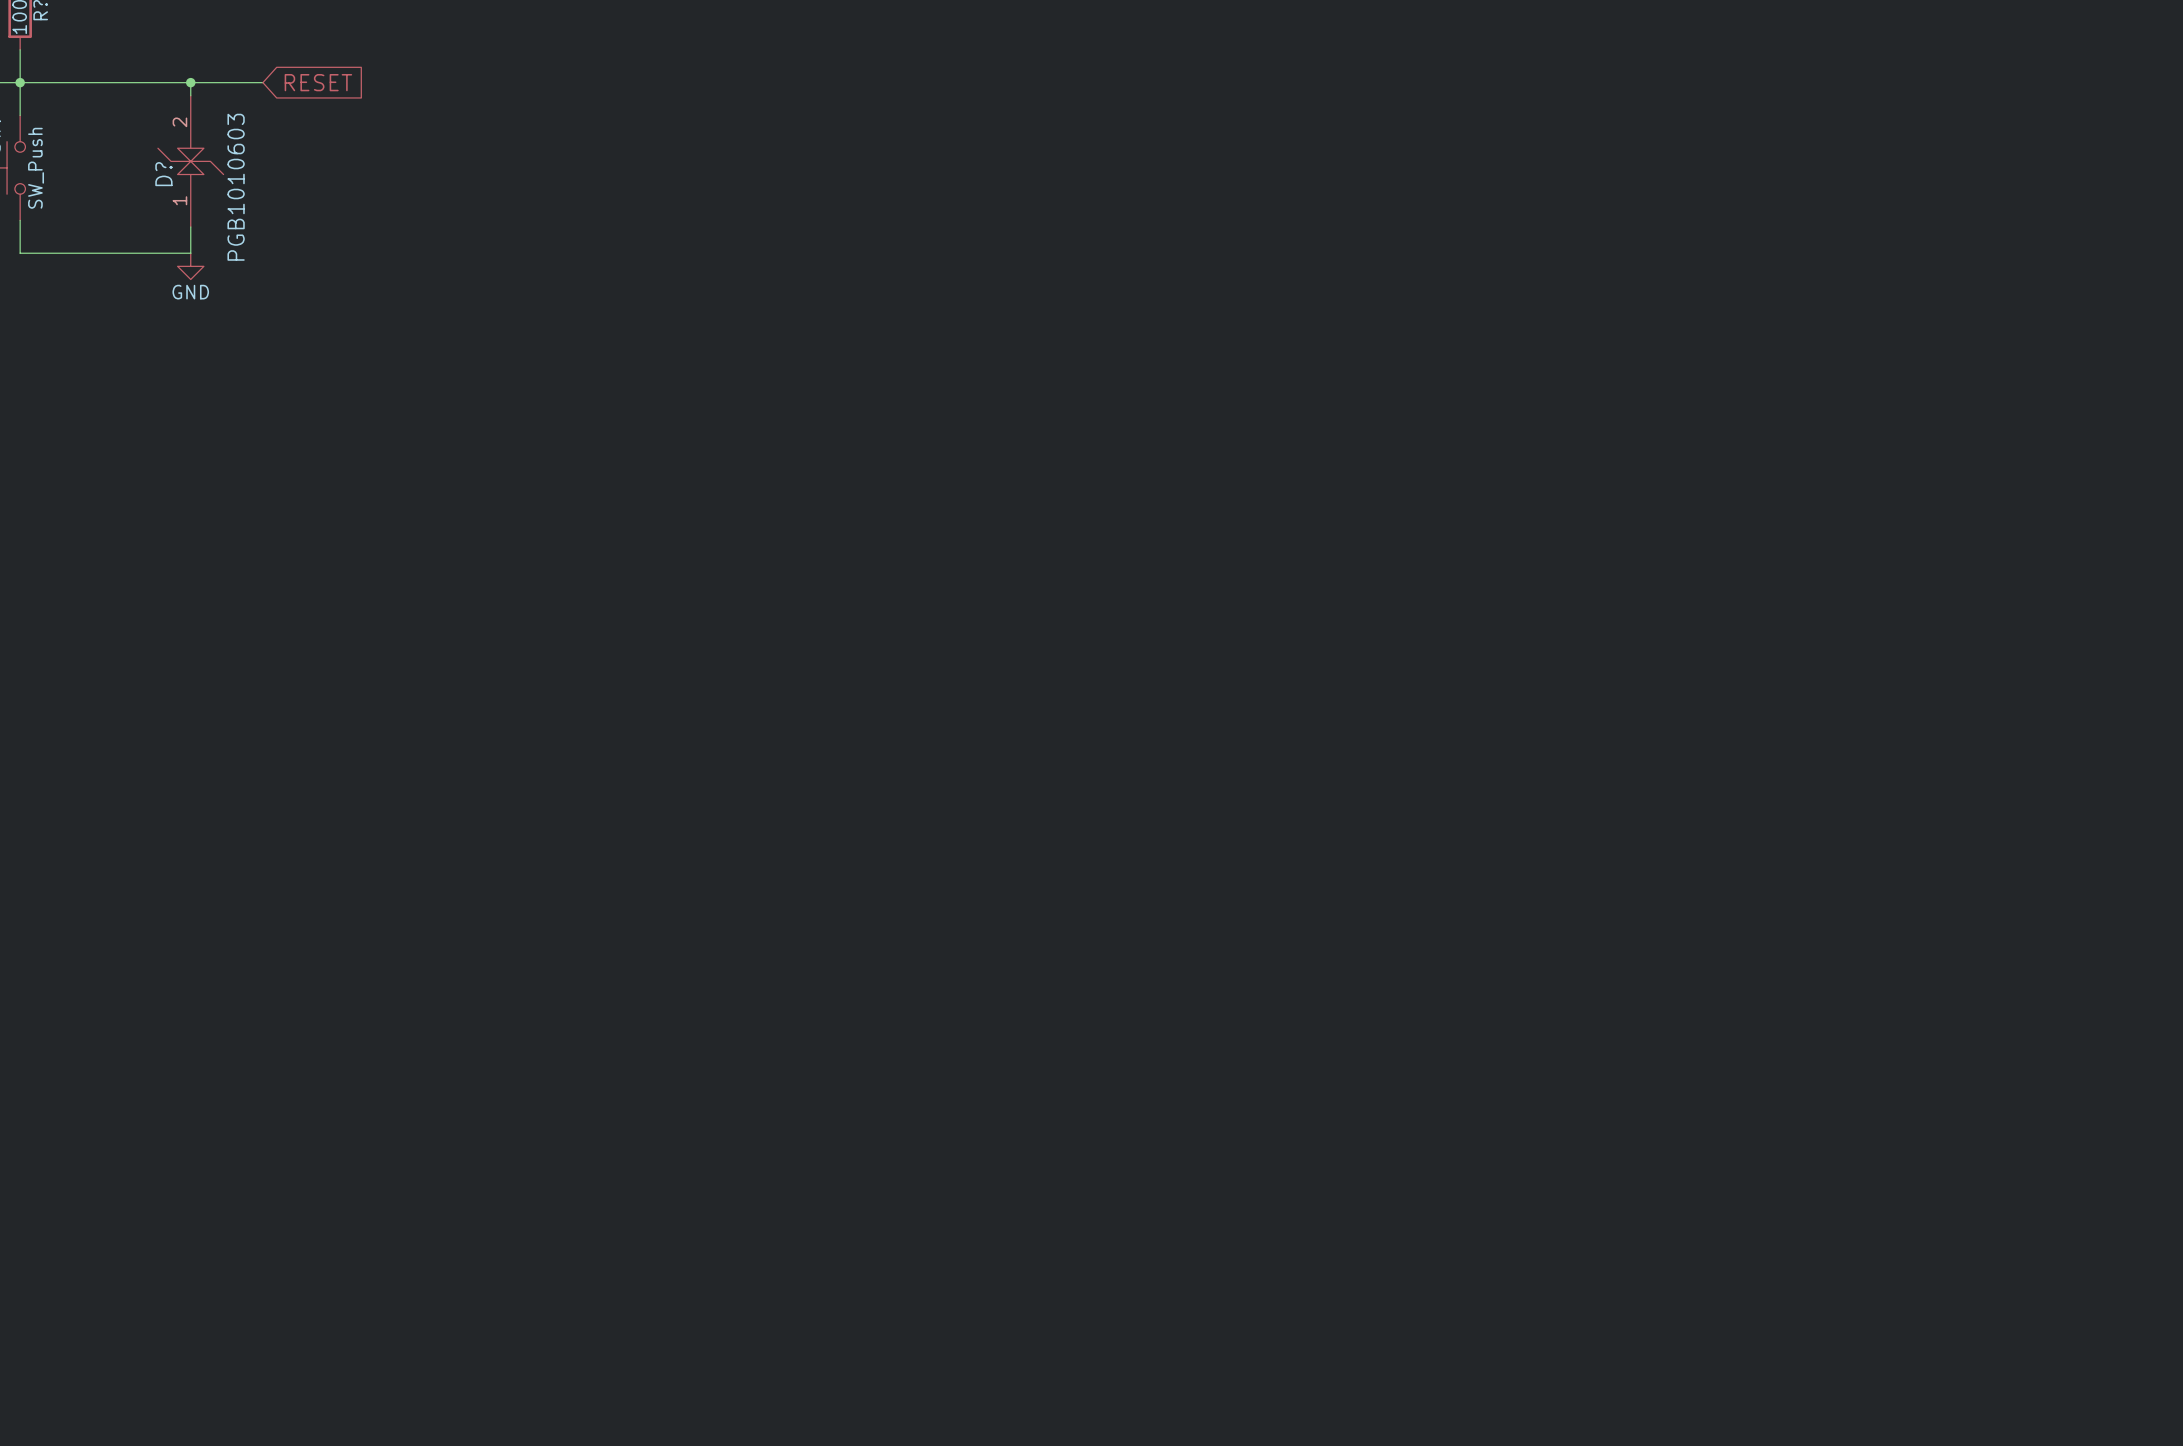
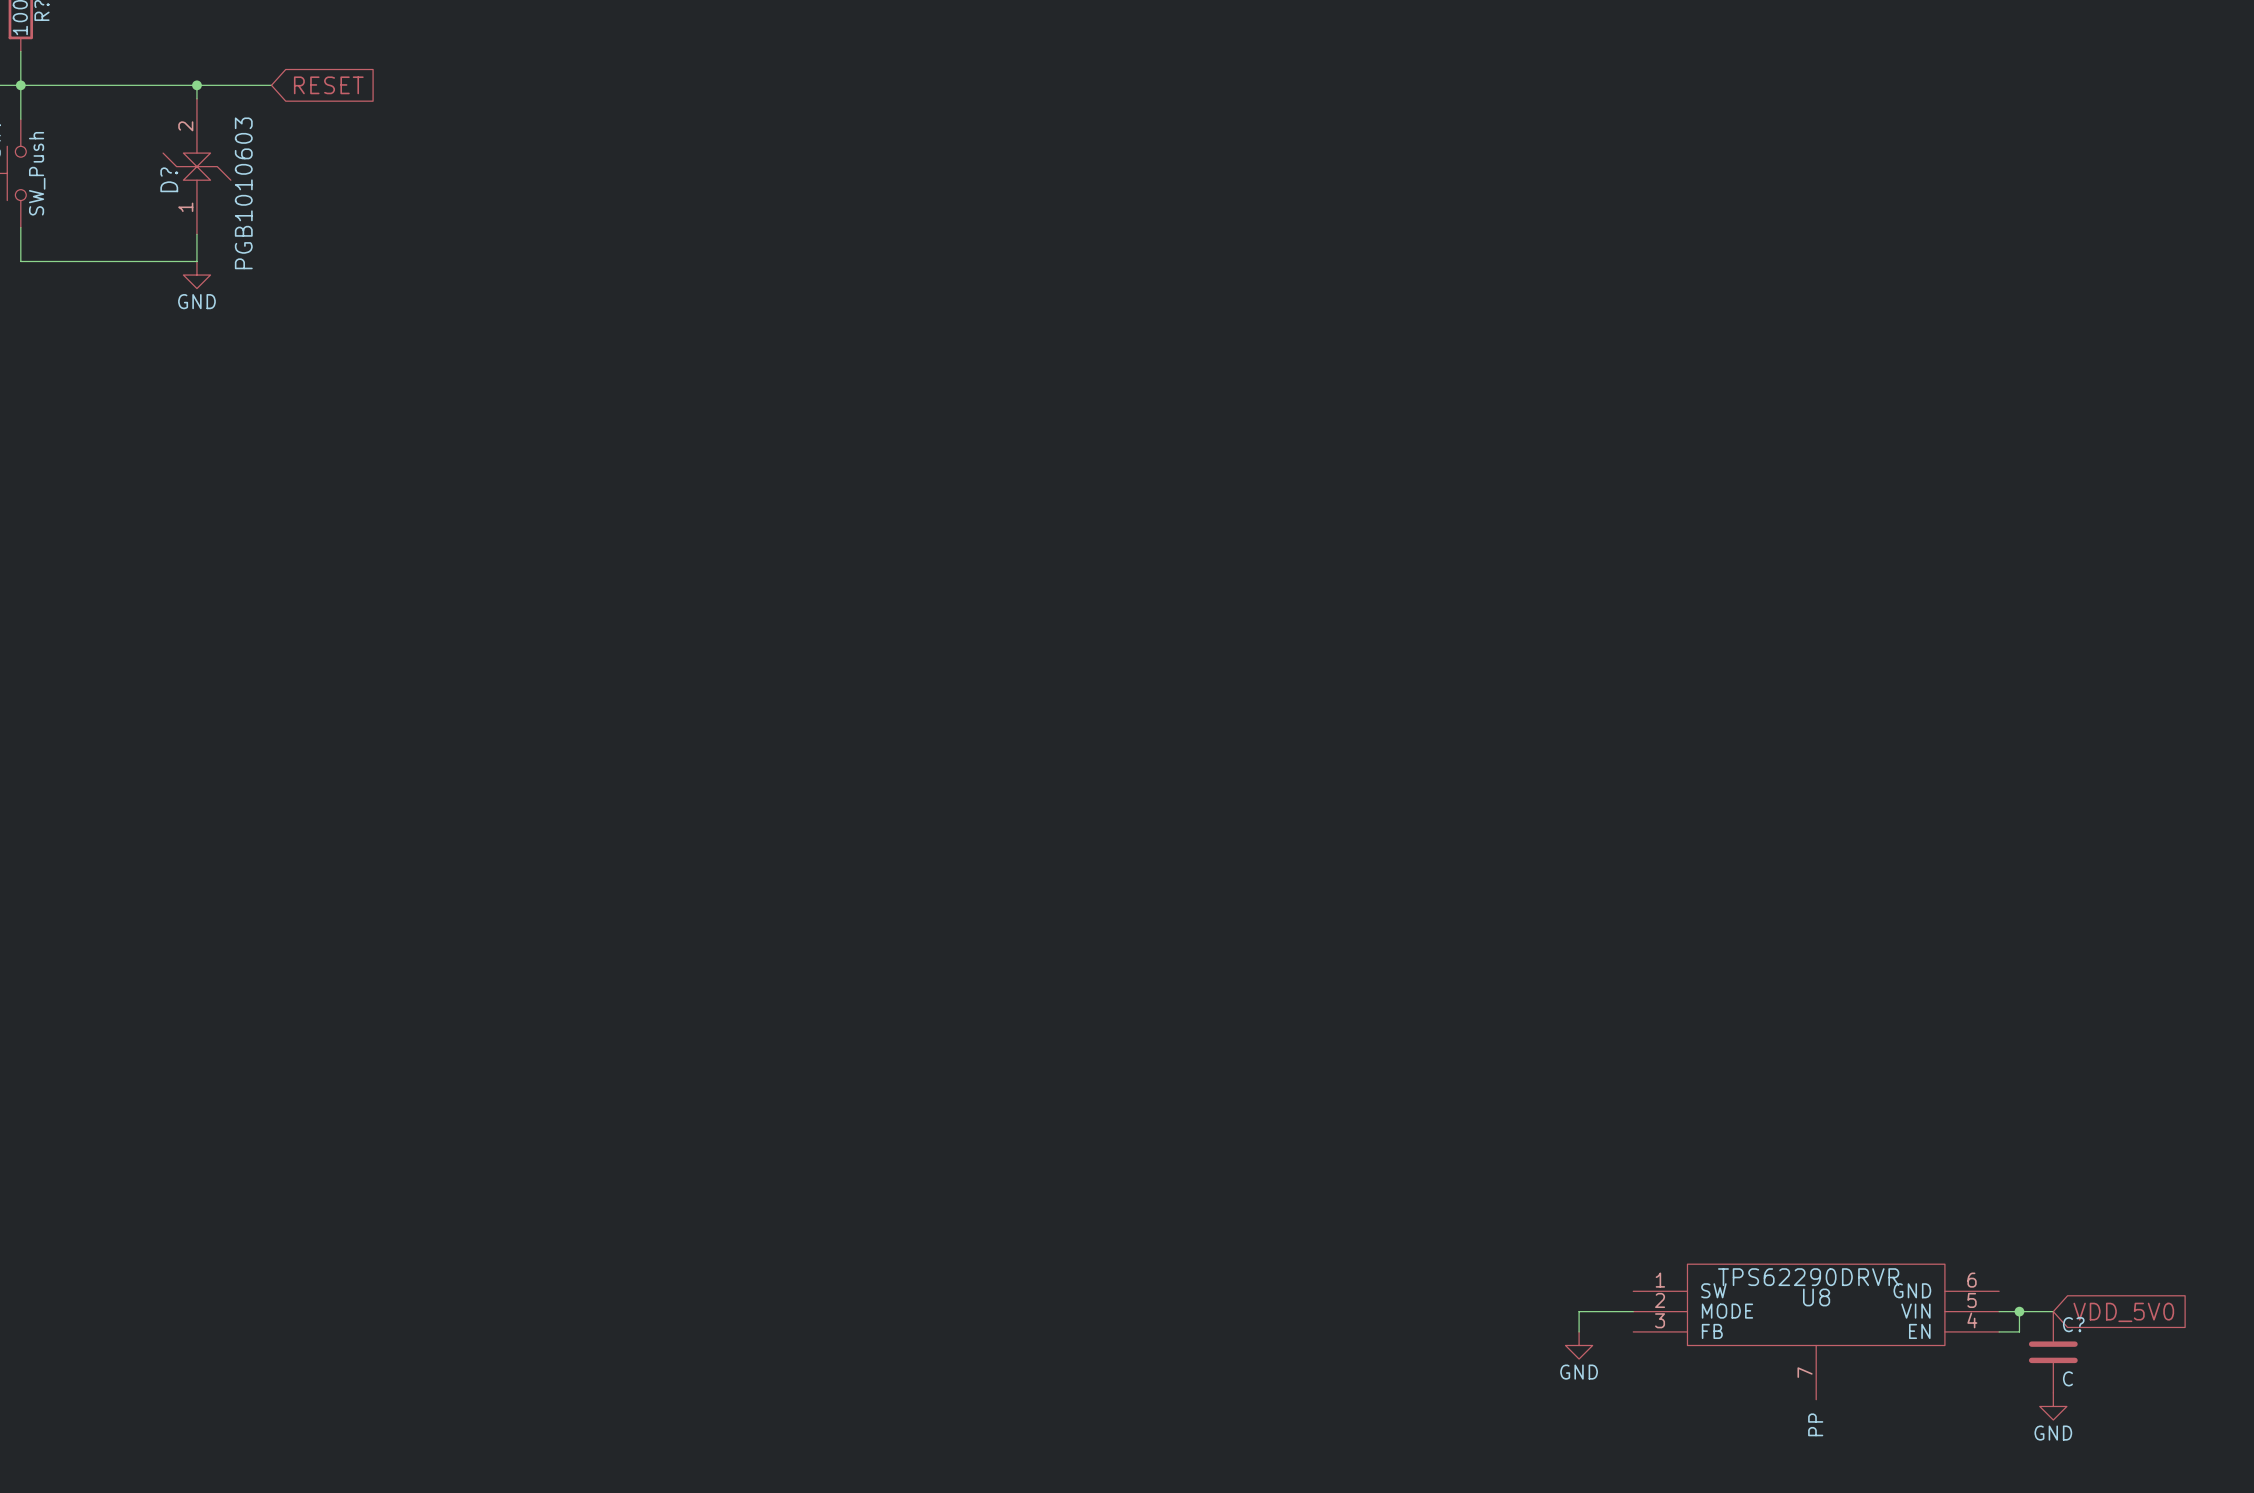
wire: none -> (1633, 1311) (1579, 1311) (1579, 1331)
wire: none -> (1999, 1311) (2053, 1311)
wire: none -> (2019, 1311) (2019, 1331) (1999, 1331)
junction: none -> (2019, 1311)
global label: none -> VDD_5V0 (2123, 1312)
U8: none -> TPS62290DRVR (1816, 1331)
power symbol: none -> GND (1579, 1345)
C?: none -> C (2053, 1352)
power symbol: none -> GND (2053, 1406)

